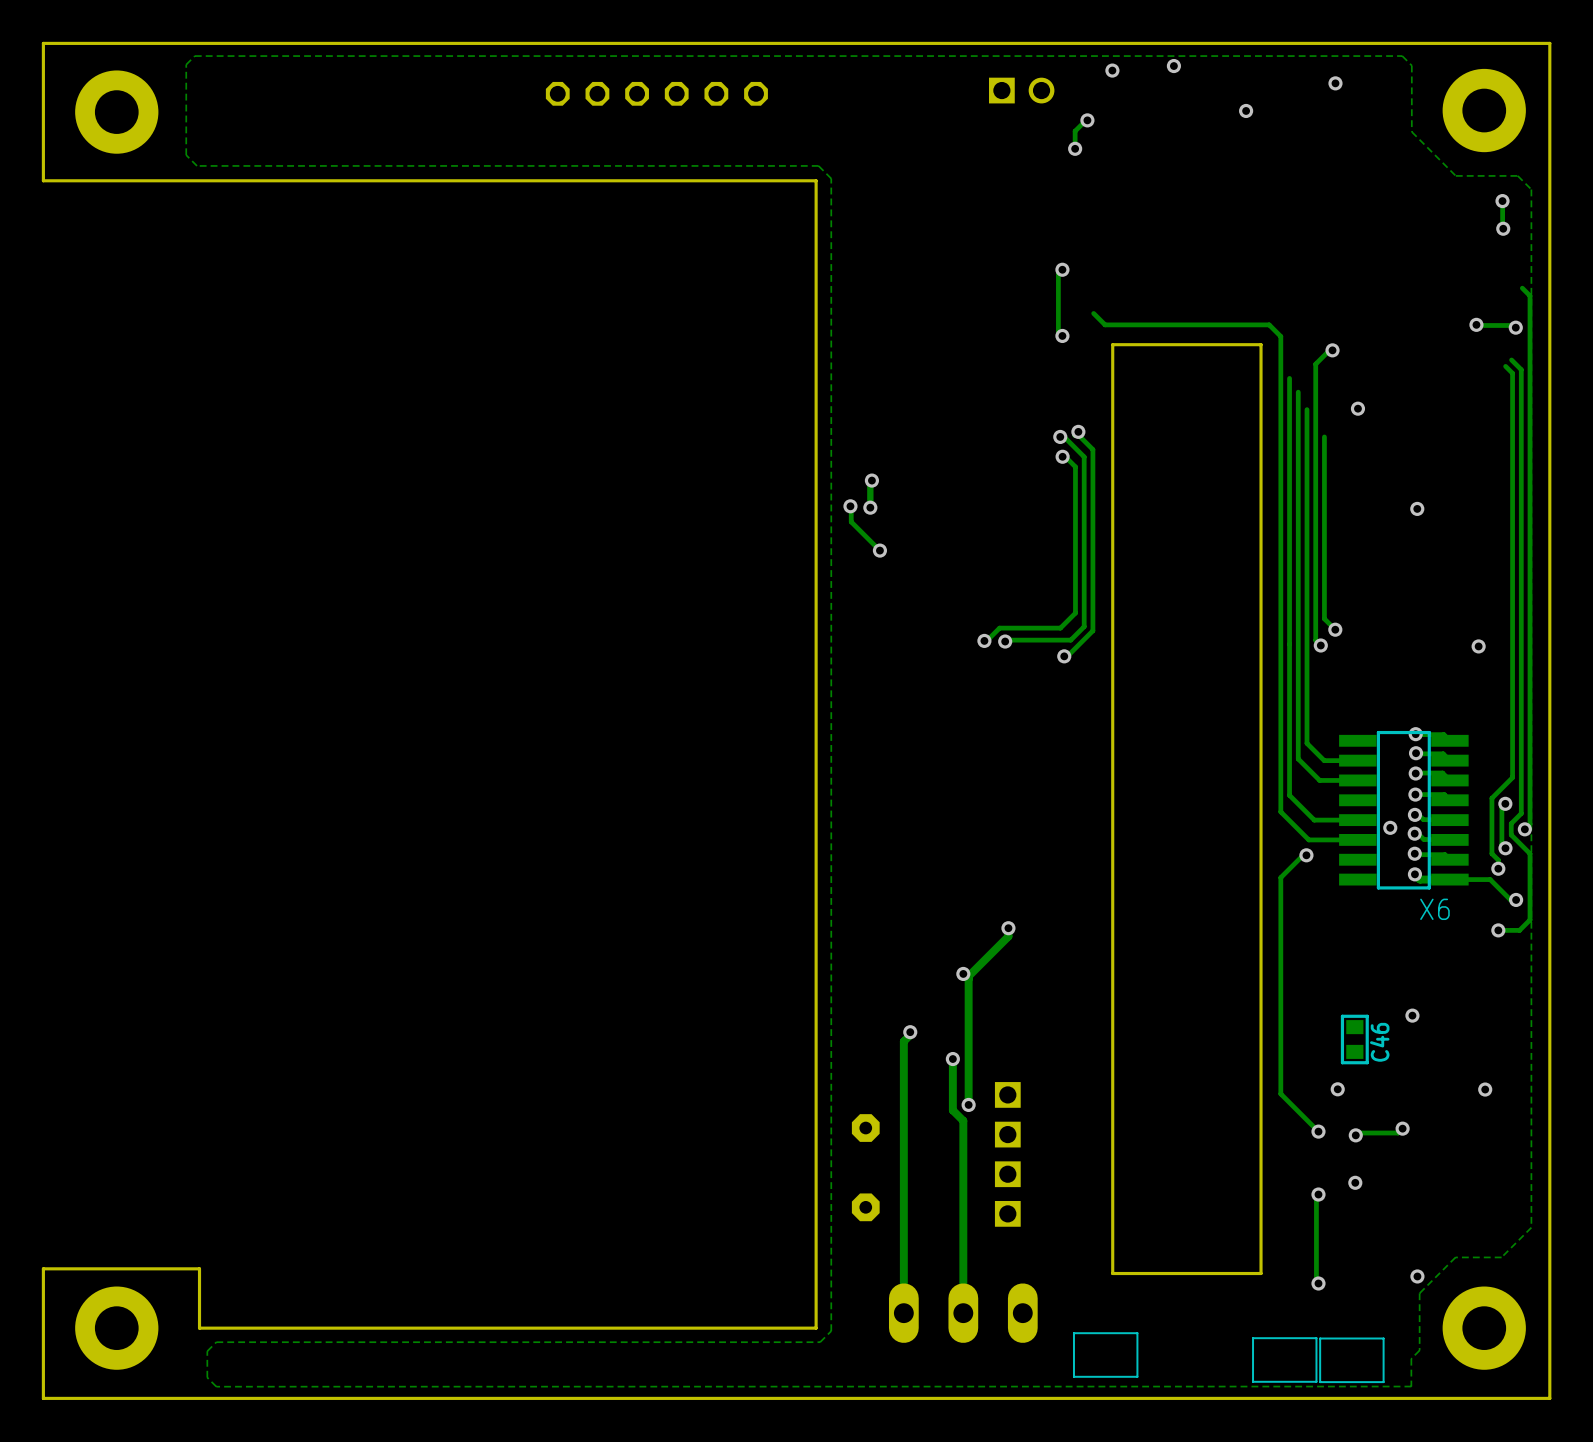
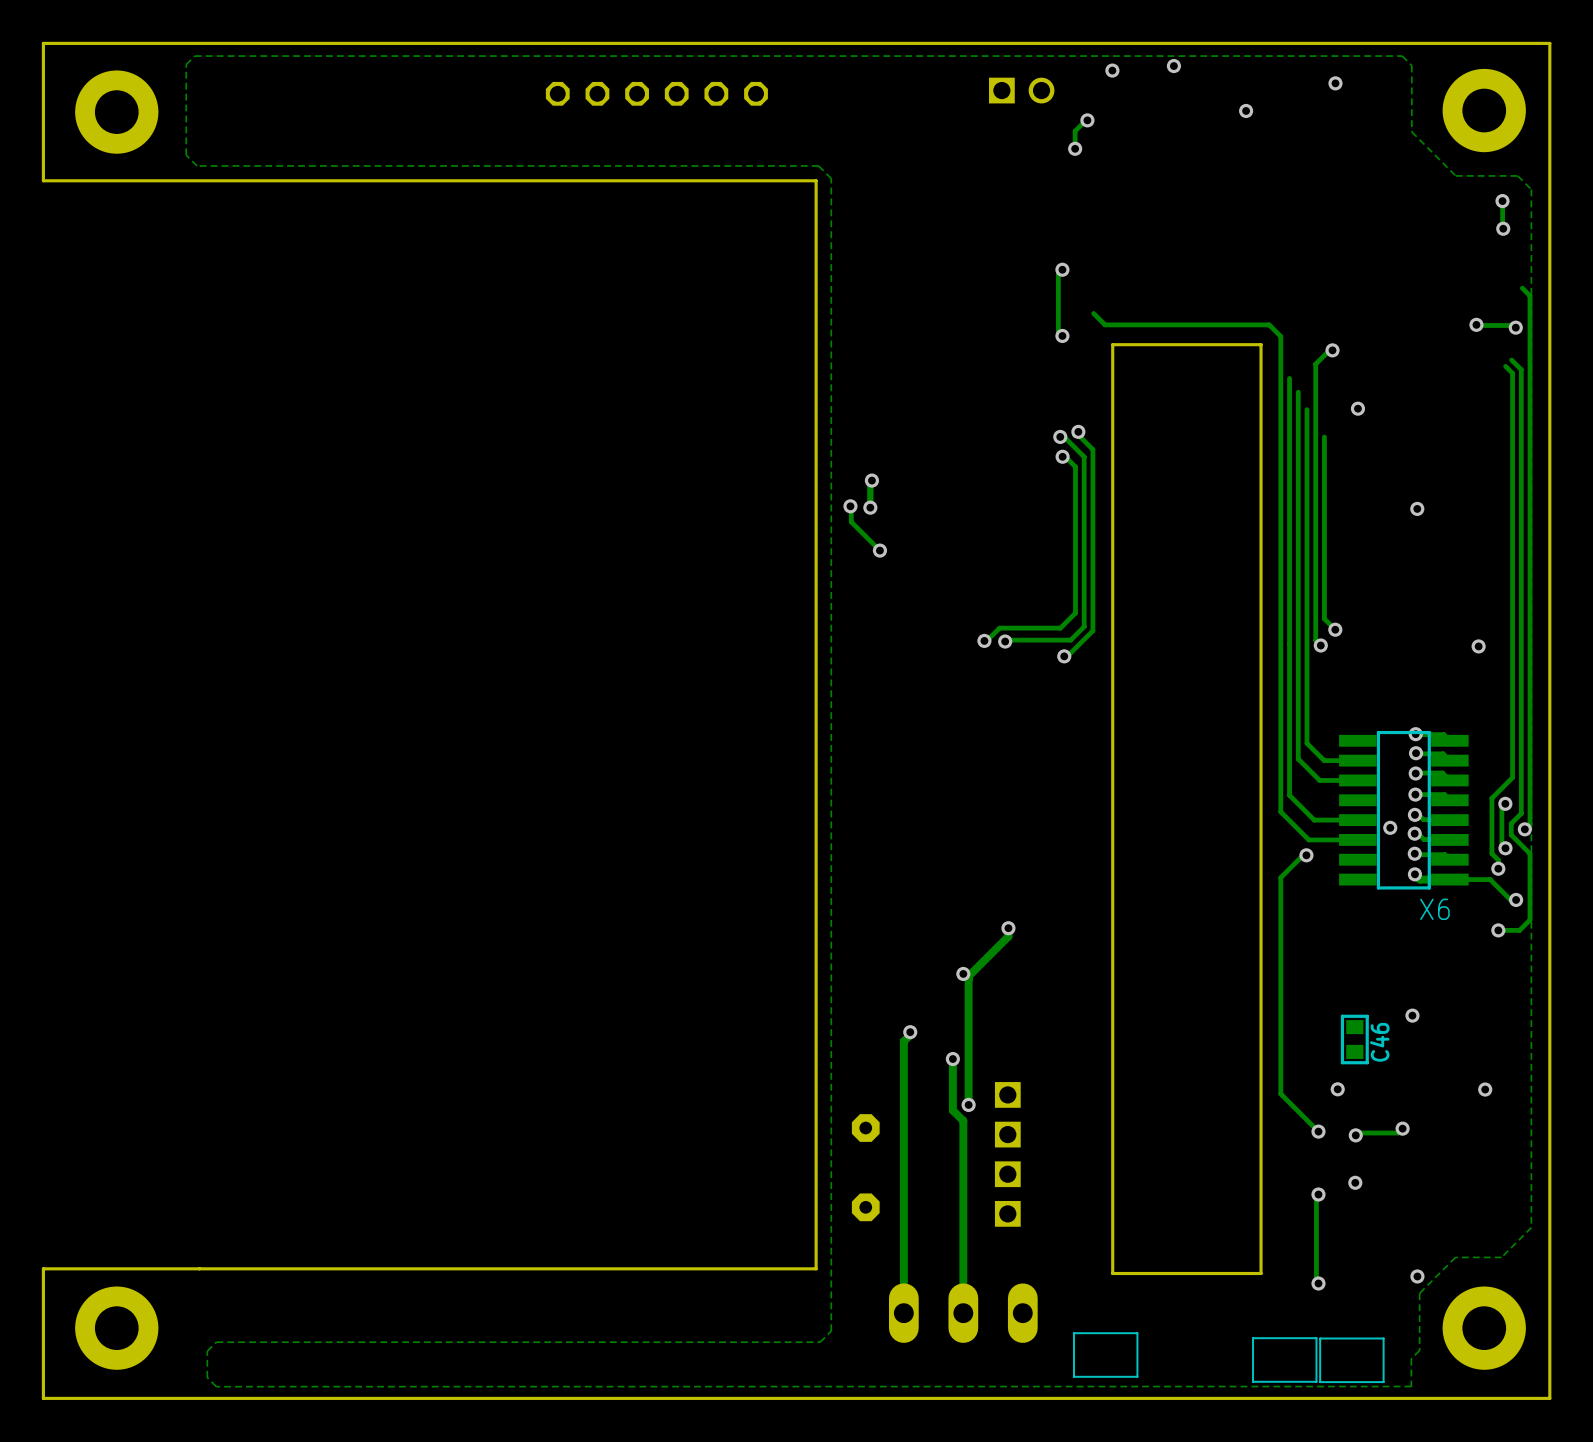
board edge: (816, 1268) (816, 1328) (199, 1328) (199, 1268) -> (816, 1268) (199, 1268)

